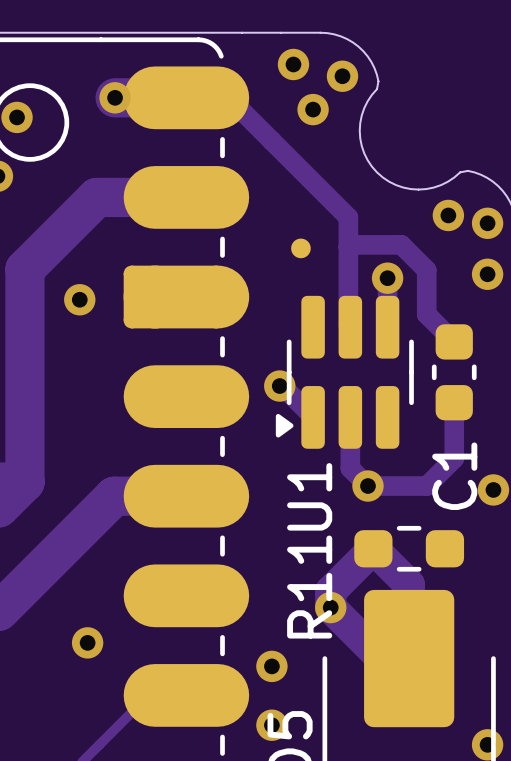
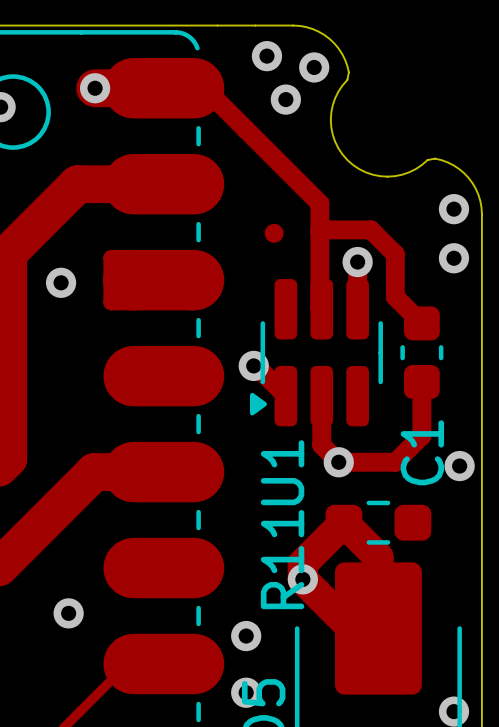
via: (448, 215) -> none

